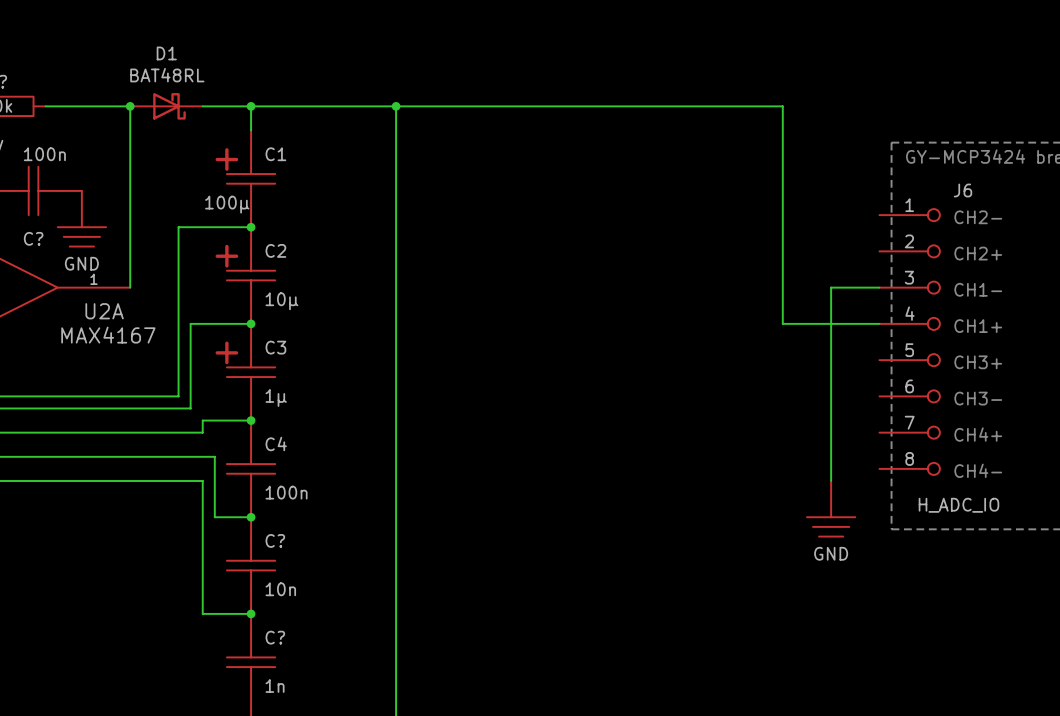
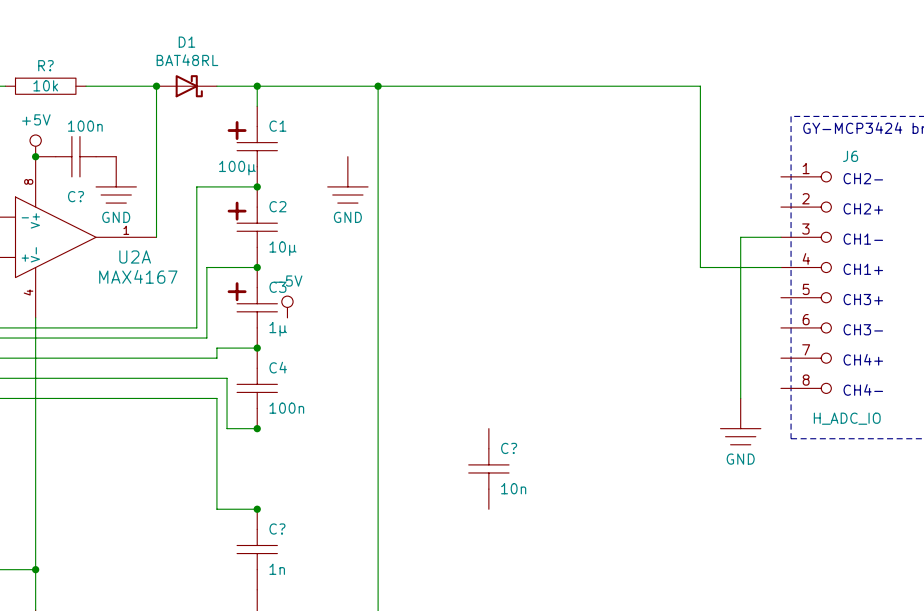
power symbol: none -> GND (347, 179)
power symbol: none -> -5V (287, 306)
C?: 10n (251, 565) -> none
C?: none -> 10n (488, 468)

